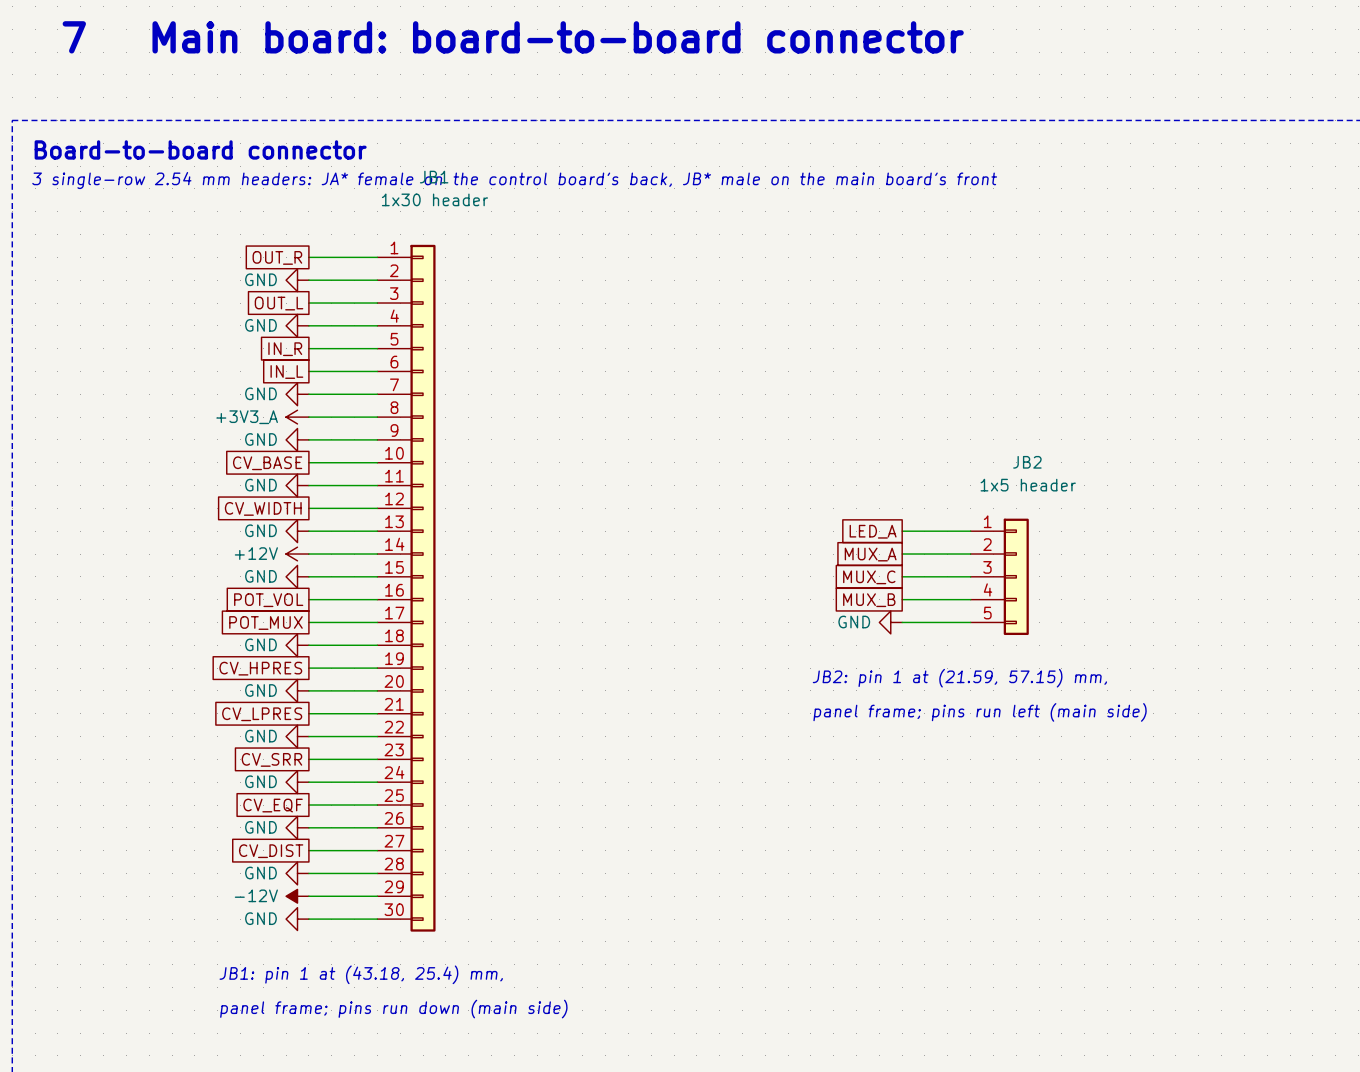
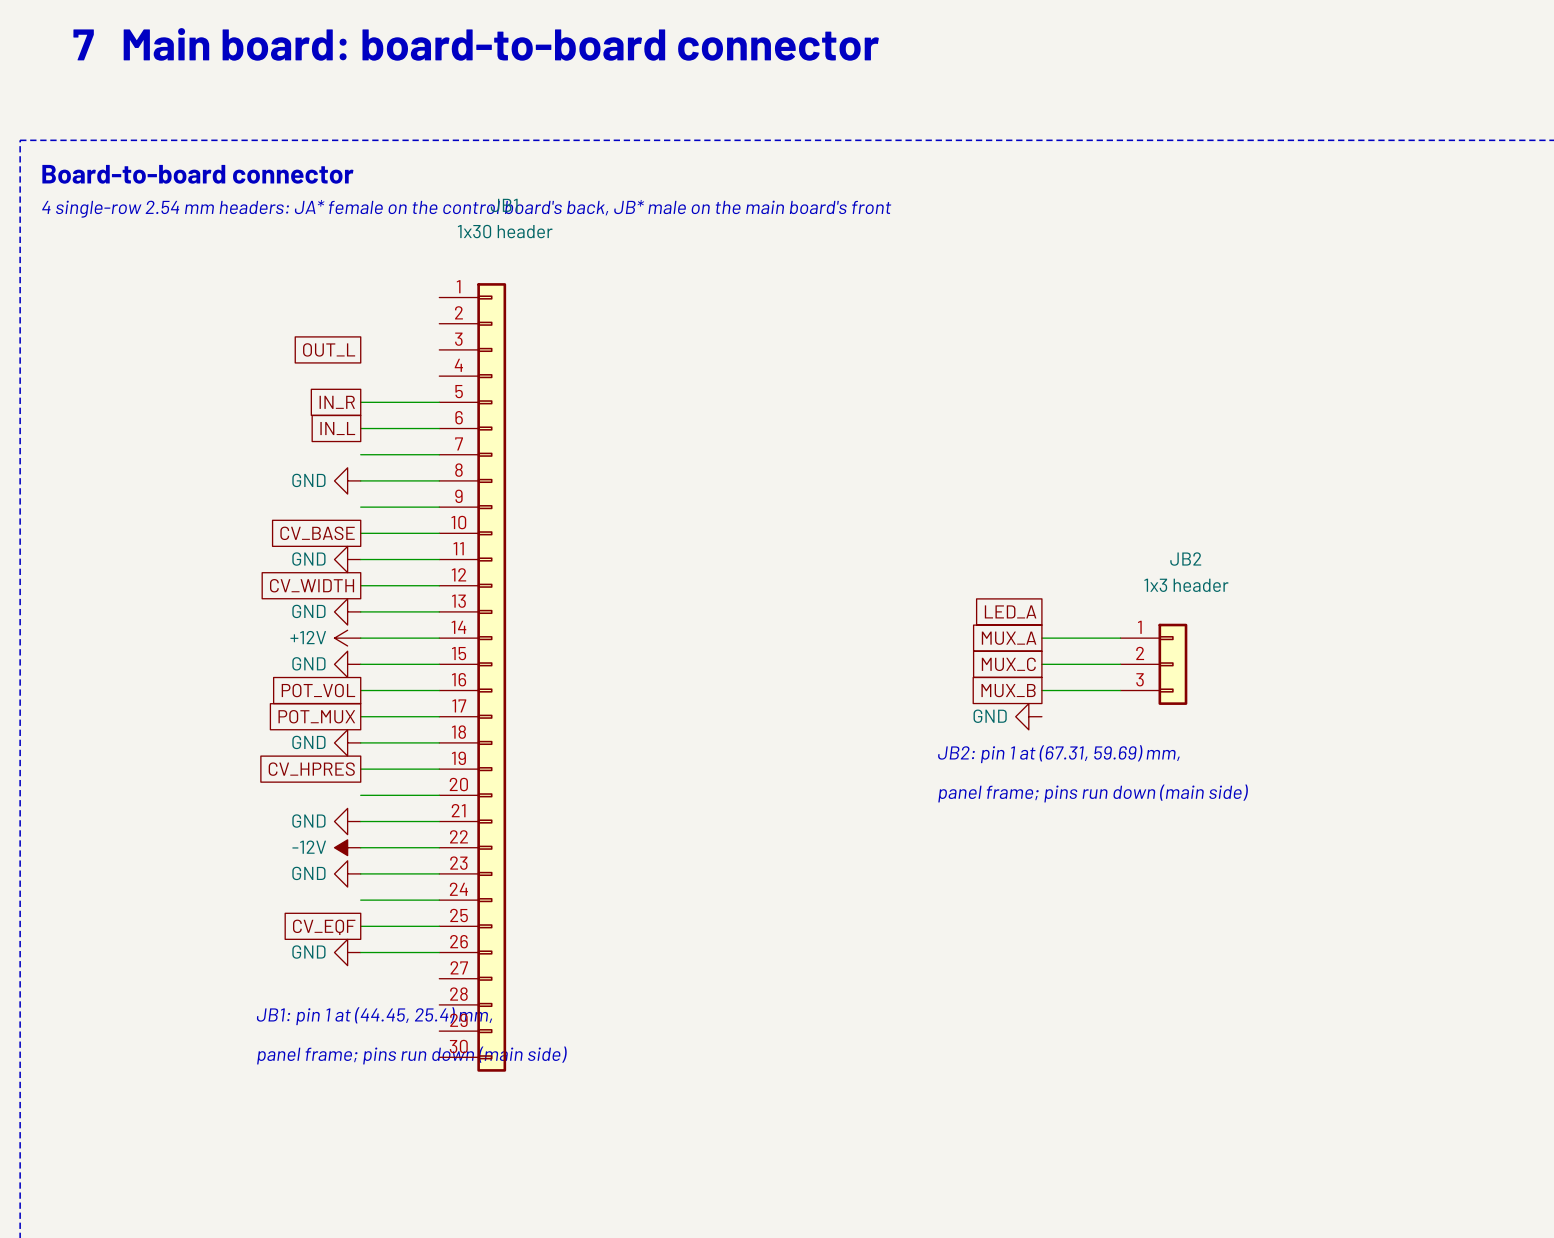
text: 3 single-row 2.54 mm headers: JA* female on the control board's back, JB* male on the main board's front (514, 180) -> 4 single-row 2.54 mm headers: JA* female on the control board's back, JB* male on the main board's front (466, 208)
global label: OUT_R (277, 257) -> none
wire: (308, 257) (377, 257) -> none
power symbol: GND (297, 280) -> none
wire: (308, 280) (377, 280) -> none
wire: (308, 303) (377, 303) -> none
power symbol: GND (297, 325) -> none
wire: (308, 325) (377, 325) -> none
power symbol: GND (297, 394) -> none
power symbol: +3V3_A (297, 417) -> GND (347, 480)
power symbol: GND (297, 439) -> none
JB2 name position: JB2 (1027, 462) -> JB2 (1185, 559)
JB2 value: 1x5 header (1028, 485) -> 1x3 header (1186, 585)
JB2 symbol: [970, 518, 1029, 636] -> [1120, 623, 1188, 705]
wire: (902, 531) (970, 531) -> none
wire: (902, 622) (970, 622) -> none
text: JB2: pin 1 at (21.59, 57.15) mm, (959, 678) -> JB2: pin 1 at (67.31, 59.69) mm, (1058, 754)
power symbol position: GND (297, 690) -> GND (347, 821)
text: panel frame; pins run left (main side) (980, 712) -> panel frame; pins run down (main side) (1093, 793)
global label: CV_LPRES (262, 714) -> none
power symbol: GND (297, 736) -> -12V (347, 847)
global label: CV_SRR (271, 759) -> none
power symbol position: GND (297, 782) -> GND (347, 873)
wire: (308, 850) (377, 850) -> none
global label: CV_DIST (271, 851) -> none
power symbol: GND (297, 873) -> none
wire: (308, 873) (377, 873) -> none
text: none -> JB1: pin 1 at (44.45, 25.4) mm, (374, 1016)
power symbol: -12V (297, 896) -> none
wire: (308, 896) (377, 896) -> none
power symbol: GND (297, 919) -> none
wire: (308, 919) (377, 919) -> none
text: JB1: pin 1 at (43.18, 25.4) mm, (361, 974) -> none
text position: panel frame; pins run down (main side) (393, 1009) -> panel frame; pins run down (main side) (411, 1055)

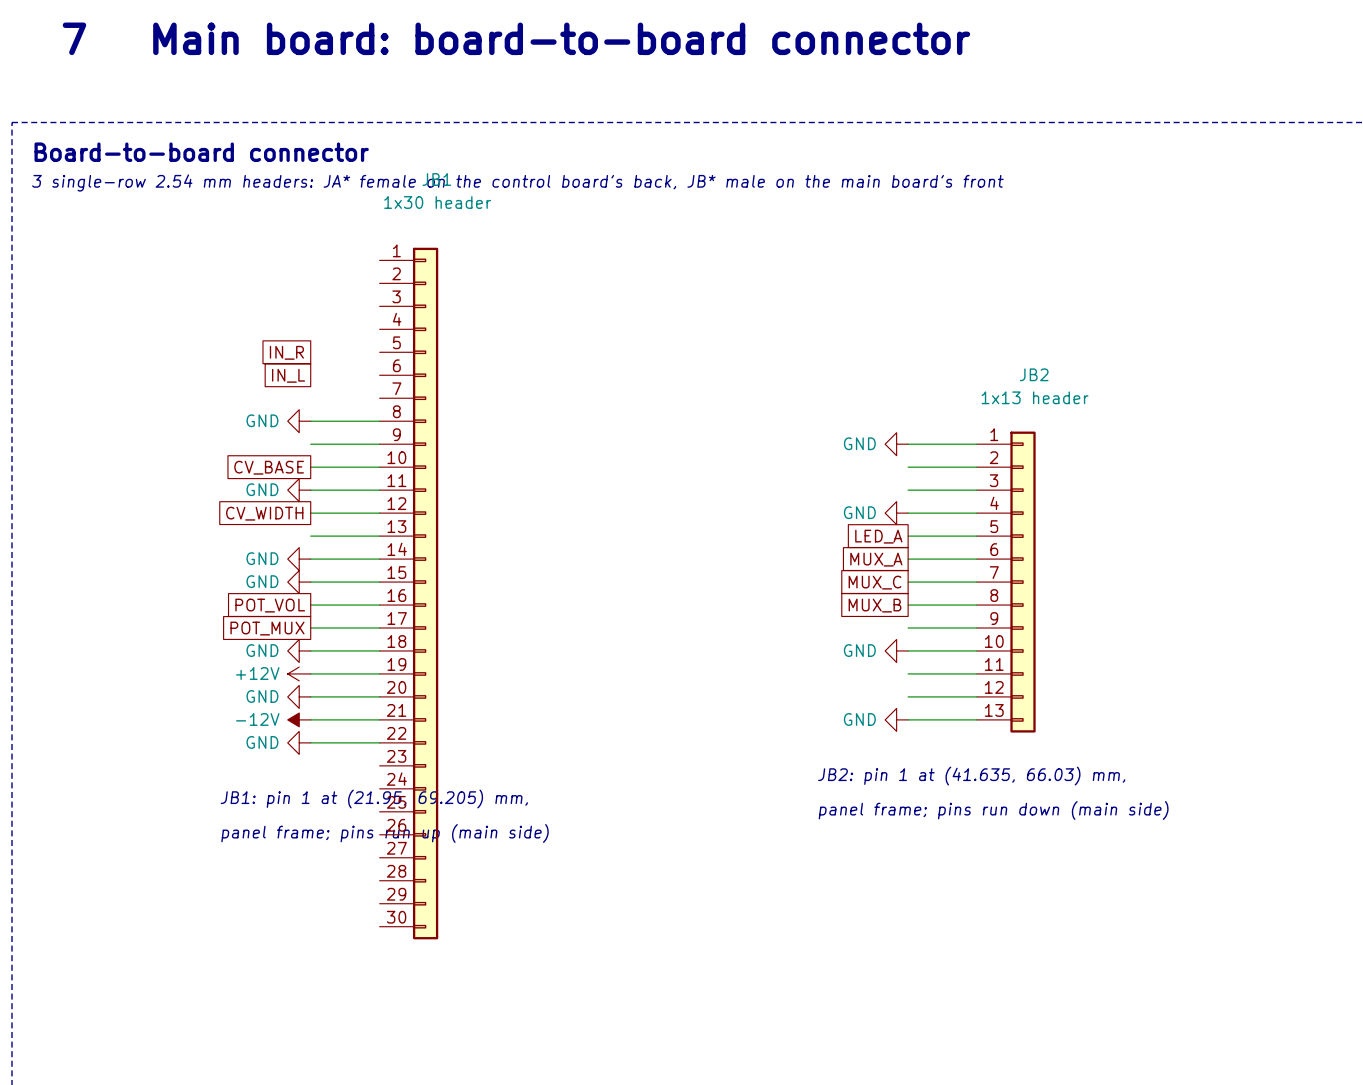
text: 4 single-row 2.54 mm headers: JA* female on the control board's back, JB* male on the main board's front (466, 208) -> 3 single-row 2.54 mm headers: JA* female on the control board's back, JB* male on the main board's front (517, 182)
global label: OUT_L (329, 349) -> none
wire: (360, 402) (439, 402) -> none
wire: (360, 428) (439, 428) -> none
wire: (360, 454) (439, 454) -> none
power symbol: none -> GND (896, 444)
wire: none -> (908, 444) (977, 444)
wire: none -> (908, 467) (977, 467)
wire: none -> (908, 490) (977, 490)
JB2 name position: JB2 (1185, 559) -> JB2 (1034, 374)
power symbol: none -> GND (896, 513)
wire: none -> (908, 513) (977, 513)
JB2 value: 1x3 header (1186, 585) -> 1x13 header (1035, 397)
power symbol: GND (347, 611) -> none
wire: none -> (908, 536) (977, 536)
JB2 symbol: [1120, 623, 1188, 705] -> [977, 431, 1036, 733]
power symbol: +12V (347, 638) -> GND (299, 559)
power symbol position: GND (1028, 716) -> GND (896, 650)
wire: none -> (908, 628) (977, 628)
wire: none -> (908, 650) (977, 650)
text: JB2: pin 1 at (67.31, 59.69) mm, (1058, 754) -> none
global label: CV_HPRES (311, 769) -> none
power symbol: none -> +12V (299, 673)
wire: none -> (908, 673) (977, 673)
text position: panel frame; pins run down (main side) (1093, 793) -> panel frame; pins run down (main side) (993, 810)
power symbol: none -> GND (299, 696)
wire: none -> (908, 696) (977, 696)
power symbol: GND (347, 821) -> -12V (299, 719)
power symbol: none -> GND (896, 719)
wire: none -> (908, 719) (977, 719)
power symbol: -12V (347, 847) -> GND (299, 742)
power symbol: GND (347, 873) -> none
wire: (360, 873) (439, 873) -> none
text: none -> JB2: pin 1 at (41.635, 66.03) mm, (971, 776)
wire: (360, 900) (439, 900) -> none
text: none -> JB1: pin 1 at (21.95, 69.205) mm, (374, 799)
wire: (360, 926) (439, 926) -> none
global label: CV_EQF (324, 927) -> none
text: none -> panel frame; pins run up (main side) (385, 833)
power symbol: GND (347, 952) -> none
wire: (360, 952) (439, 952) -> none
text: JB1: pin 1 at (44.45, 25.4) mm, (374, 1016) -> none
text: panel frame; pins run down (main side) (411, 1055) -> none

